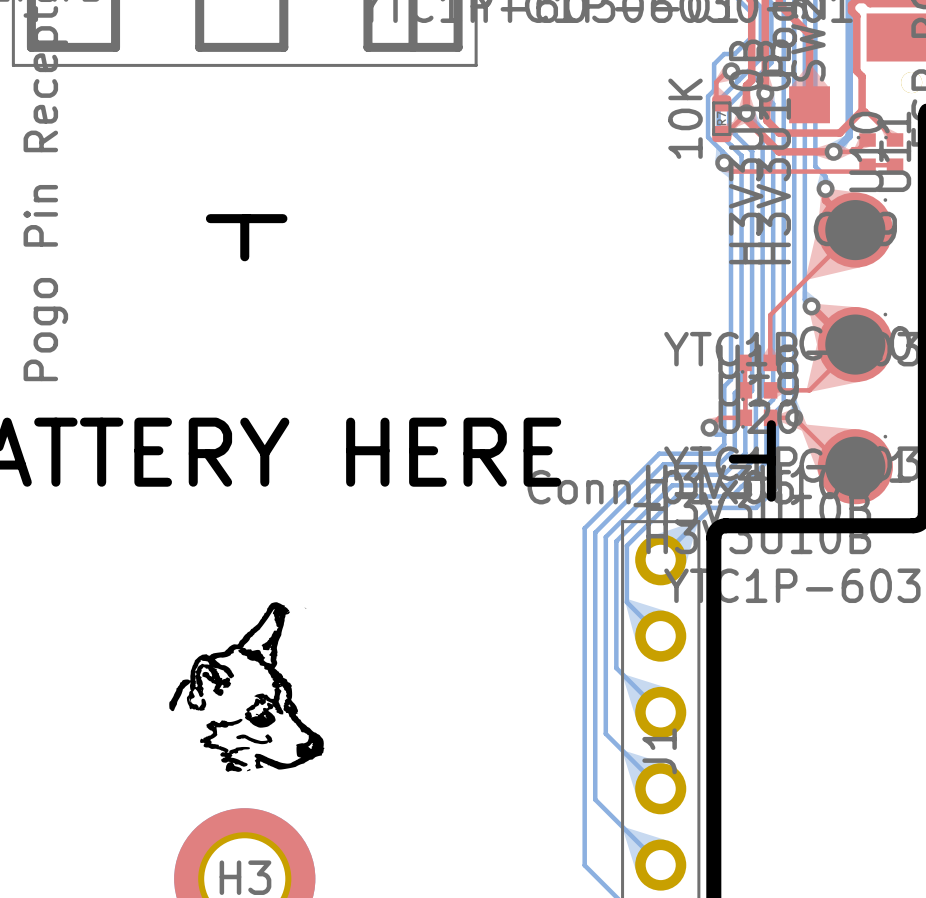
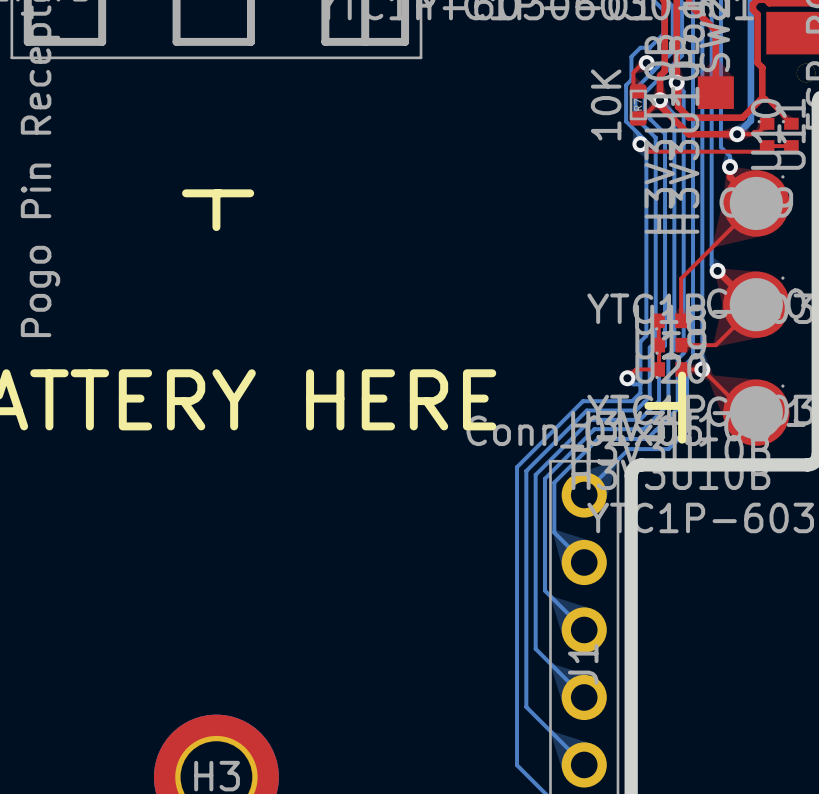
drawing: [169, 602, 325, 772] -> none

